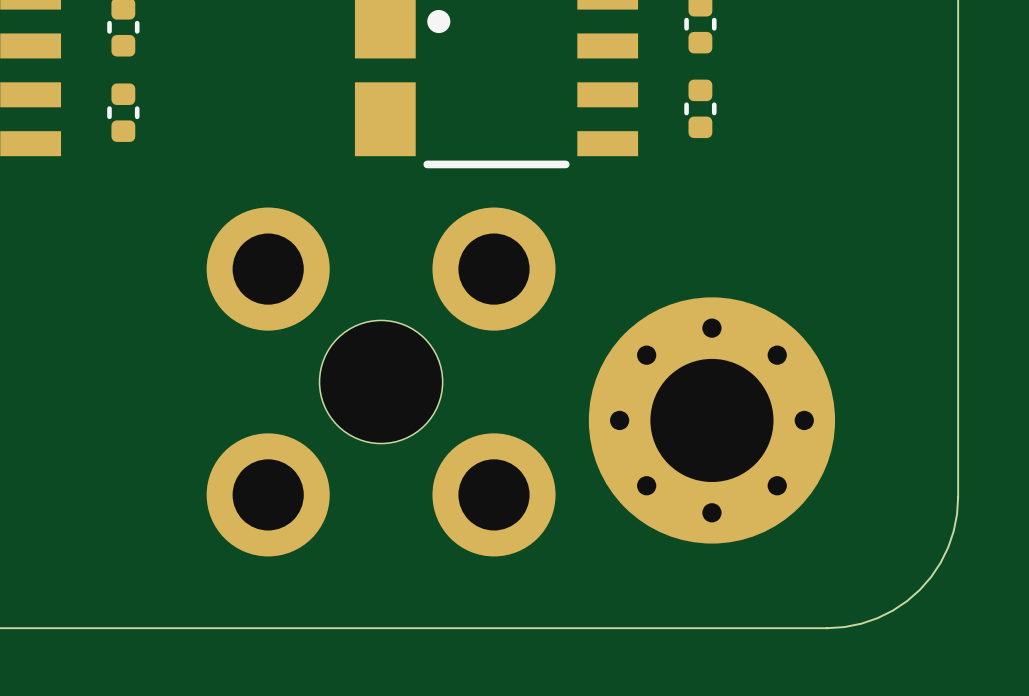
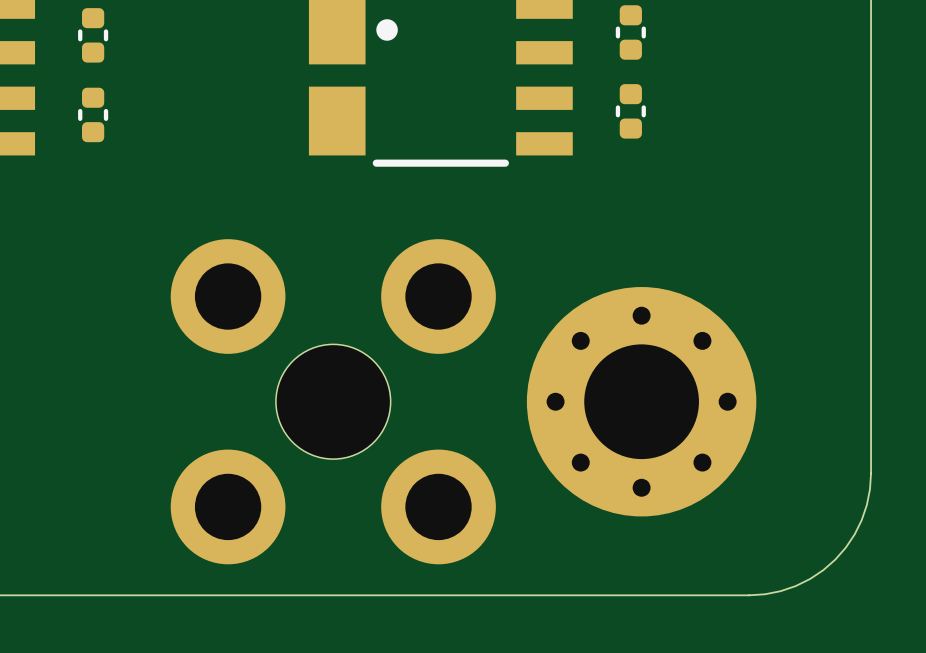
part position: (381, 381) -> (333, 401)

